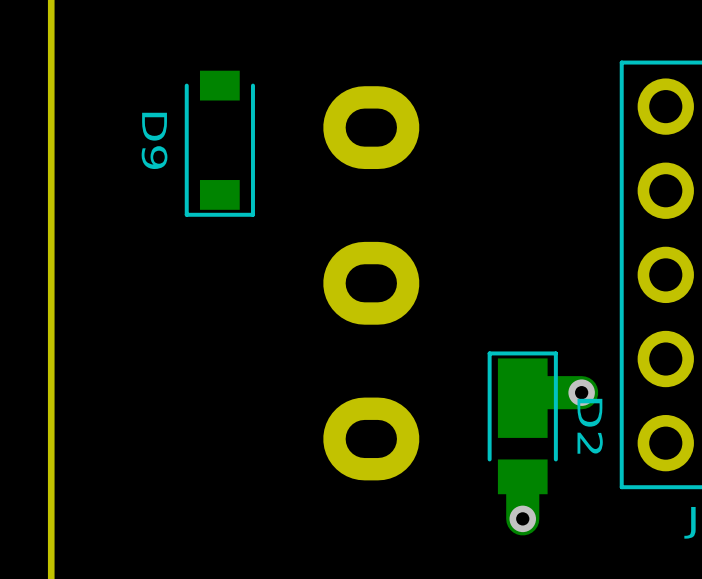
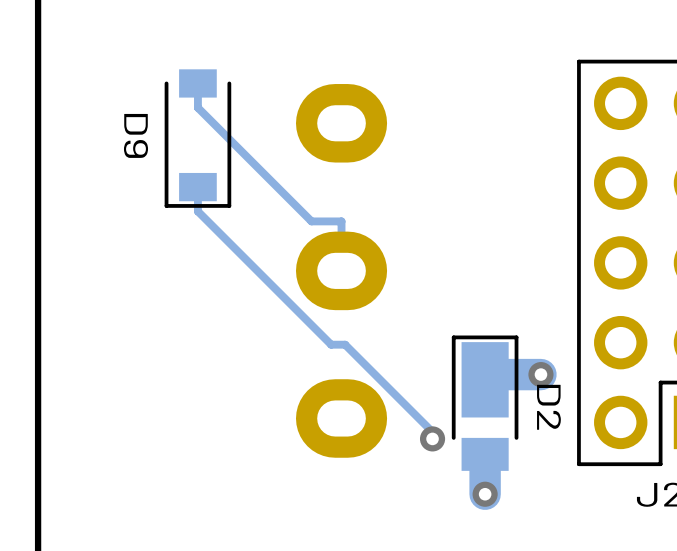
track: none -> (197, 83) (197, 107) (311, 221) (341, 221) (341, 270)
track: none -> (197, 187) (197, 211) (331, 344) (345, 344) (432, 432) (432, 438)
via: none -> (432, 438)

